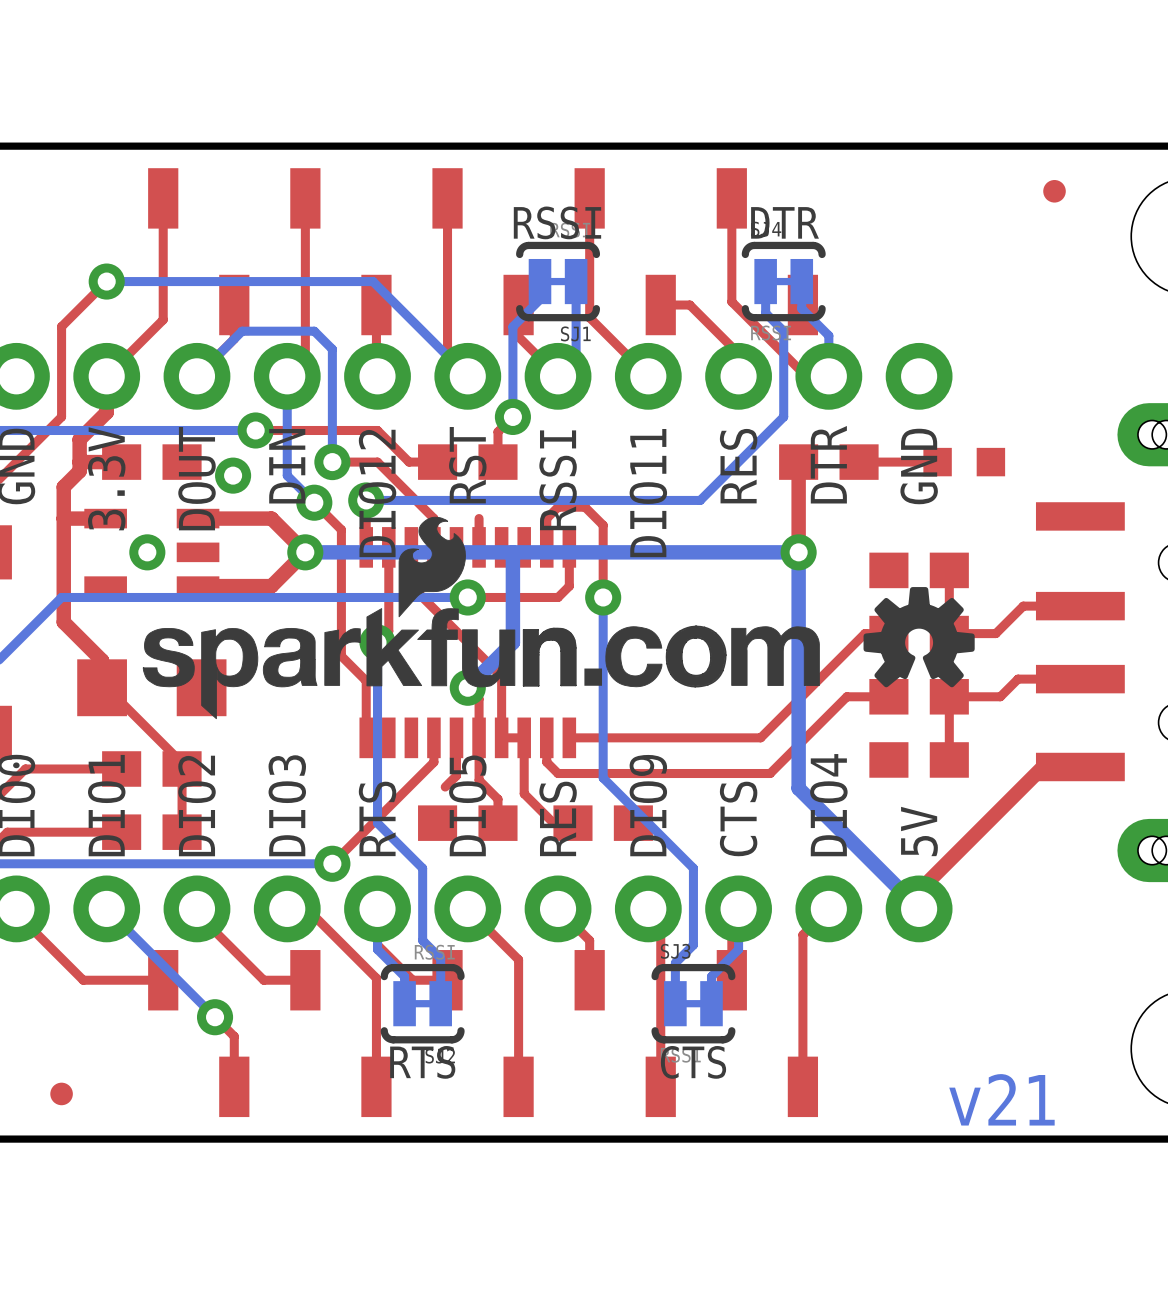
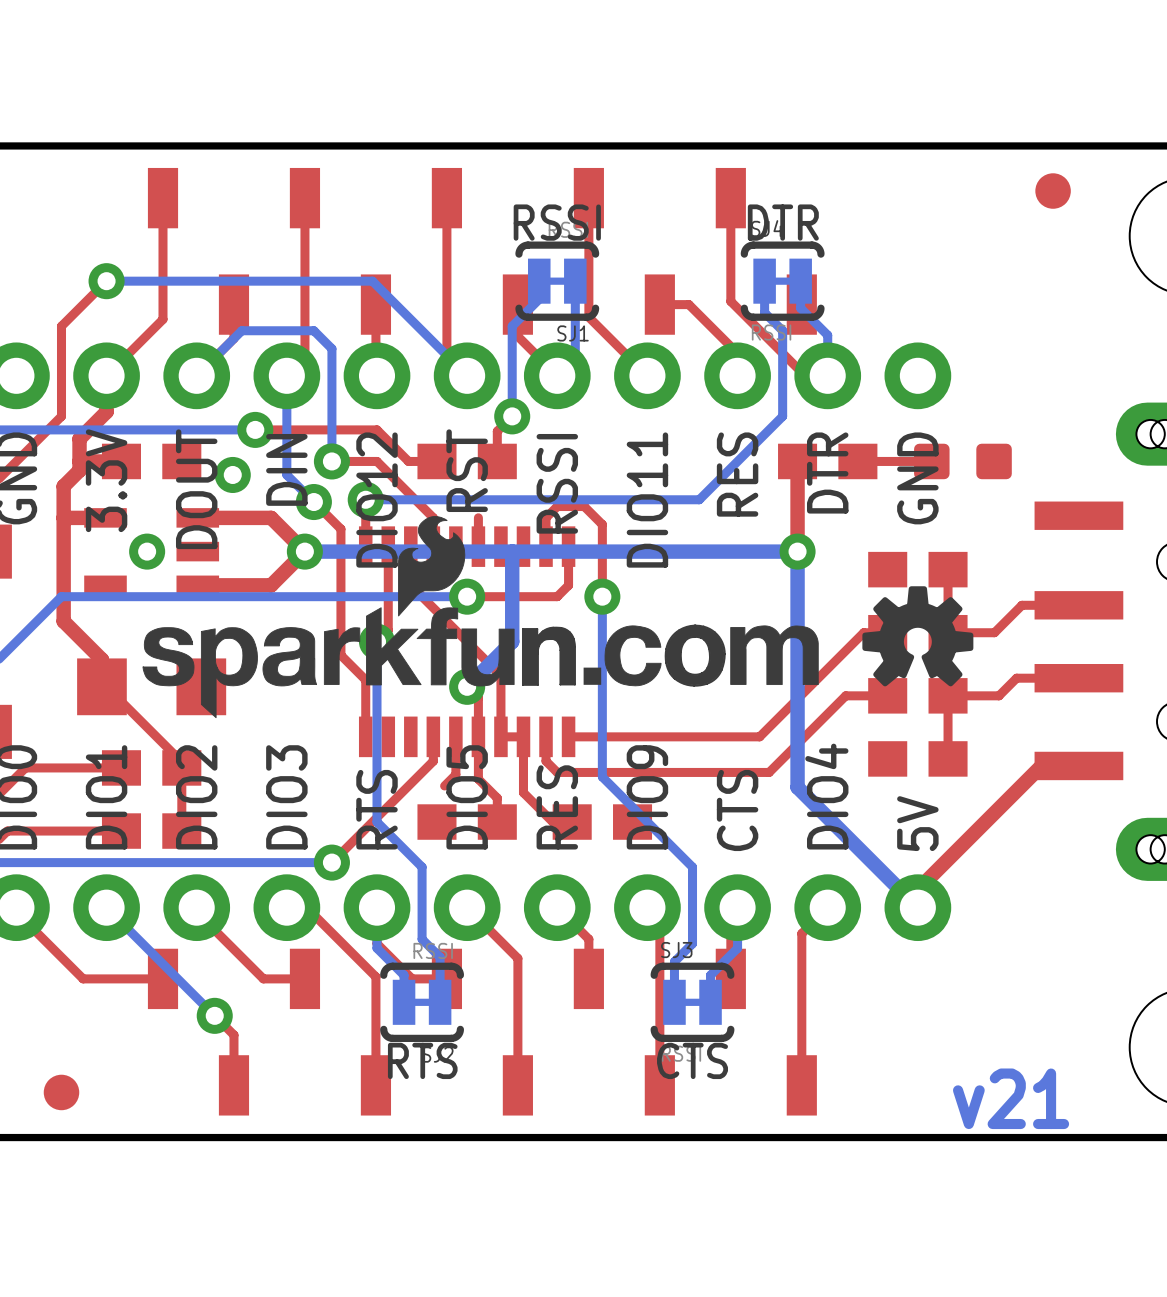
part footprint: [1043, 180, 1066, 203] -> [1035, 173, 1071, 209]
part footprint: [923, 447, 1006, 477] -> [914, 443, 1012, 480]
part footprint: [50, 1082, 73, 1106] -> [43, 1074, 80, 1111]

